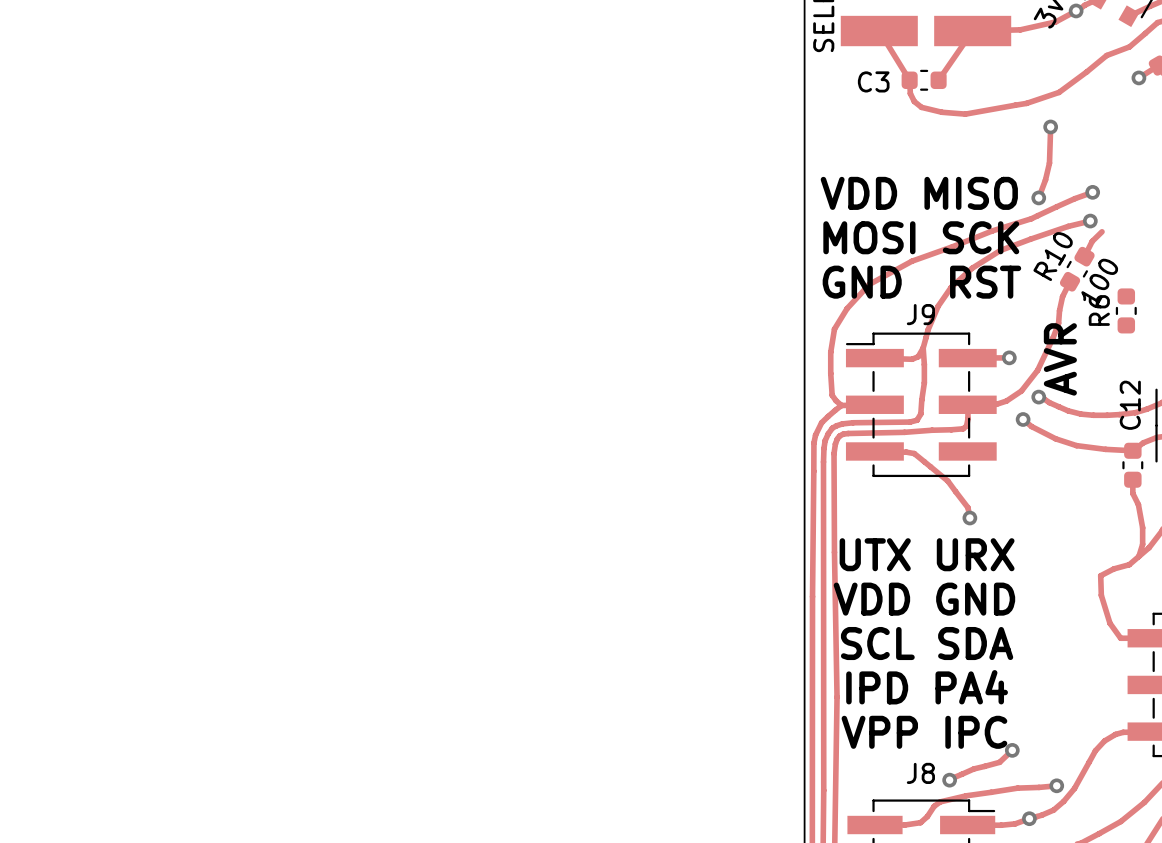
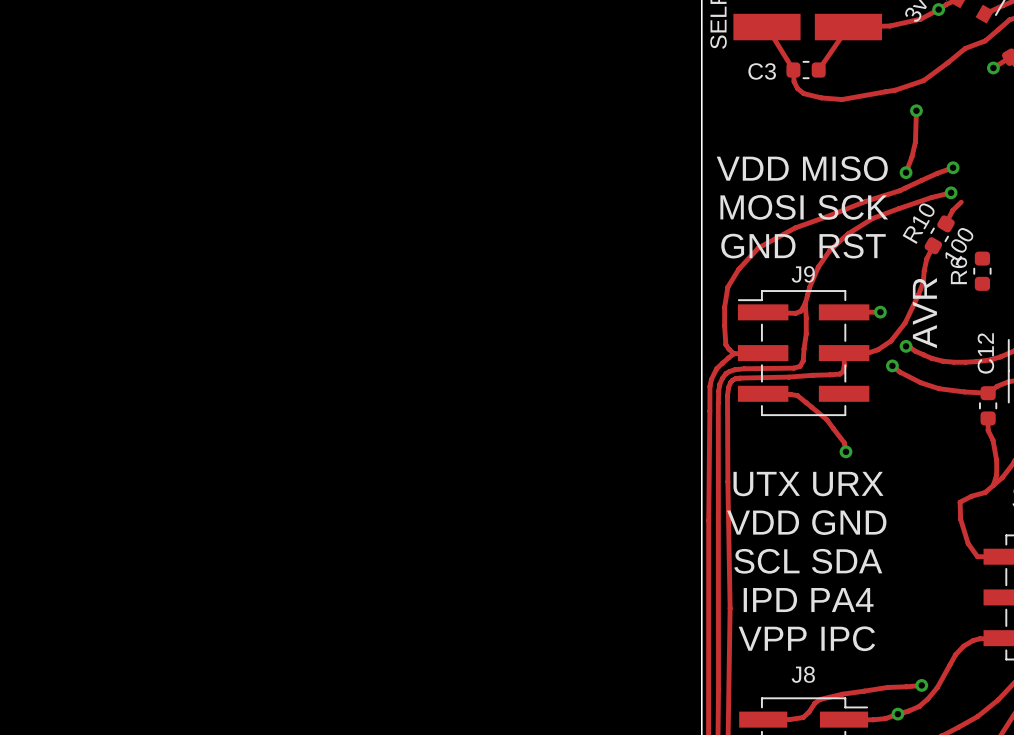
track: (1012, 750) (999, 762) (973, 768) (949, 780) -> none
via: (1012, 750) -> none
via: (949, 780) -> none

